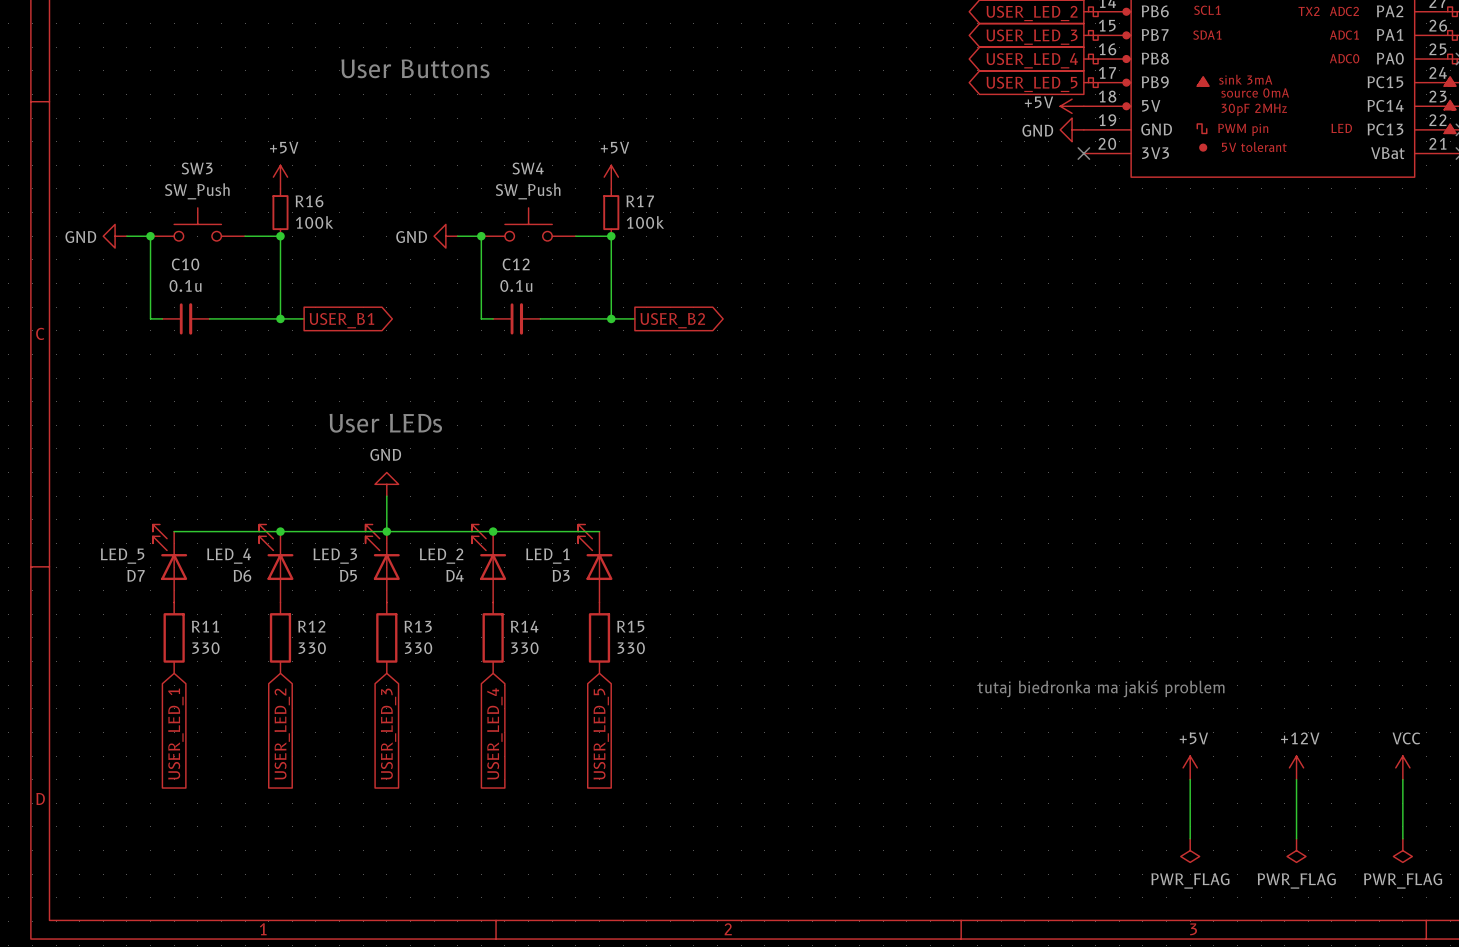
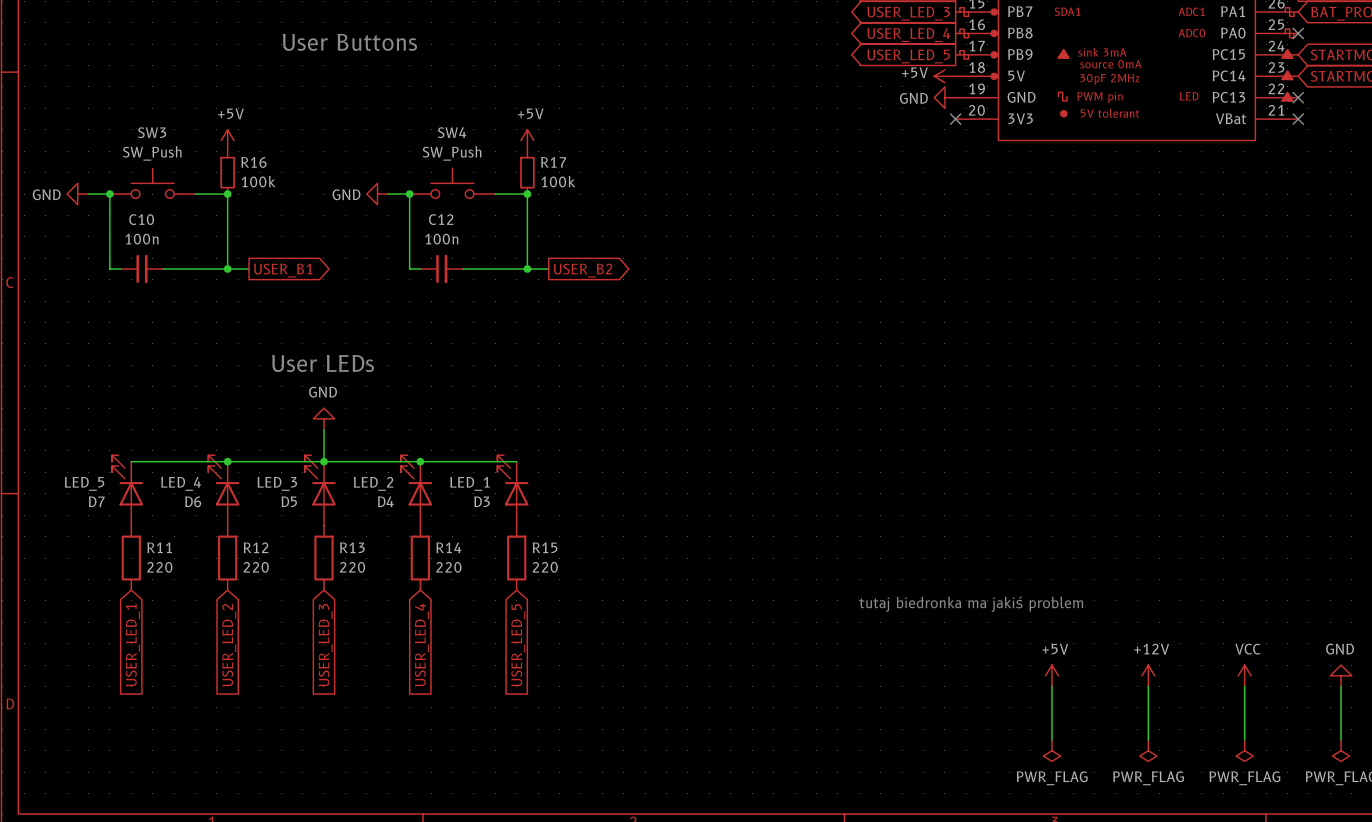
C10 value: 0.1u (185, 285) -> 100n (141, 239)
C12 value: 0.1u (516, 285) -> 100n (441, 239)
R11 value: 330 (205, 648) -> 220 (159, 567)
R12 value: 330 (312, 648) -> 220 (256, 567)
R13 value: 330 (418, 648) -> 220 (352, 567)
R14 value: 330 (524, 648) -> 220 (448, 567)
R15 value: 330 (631, 648) -> 220 (545, 567)

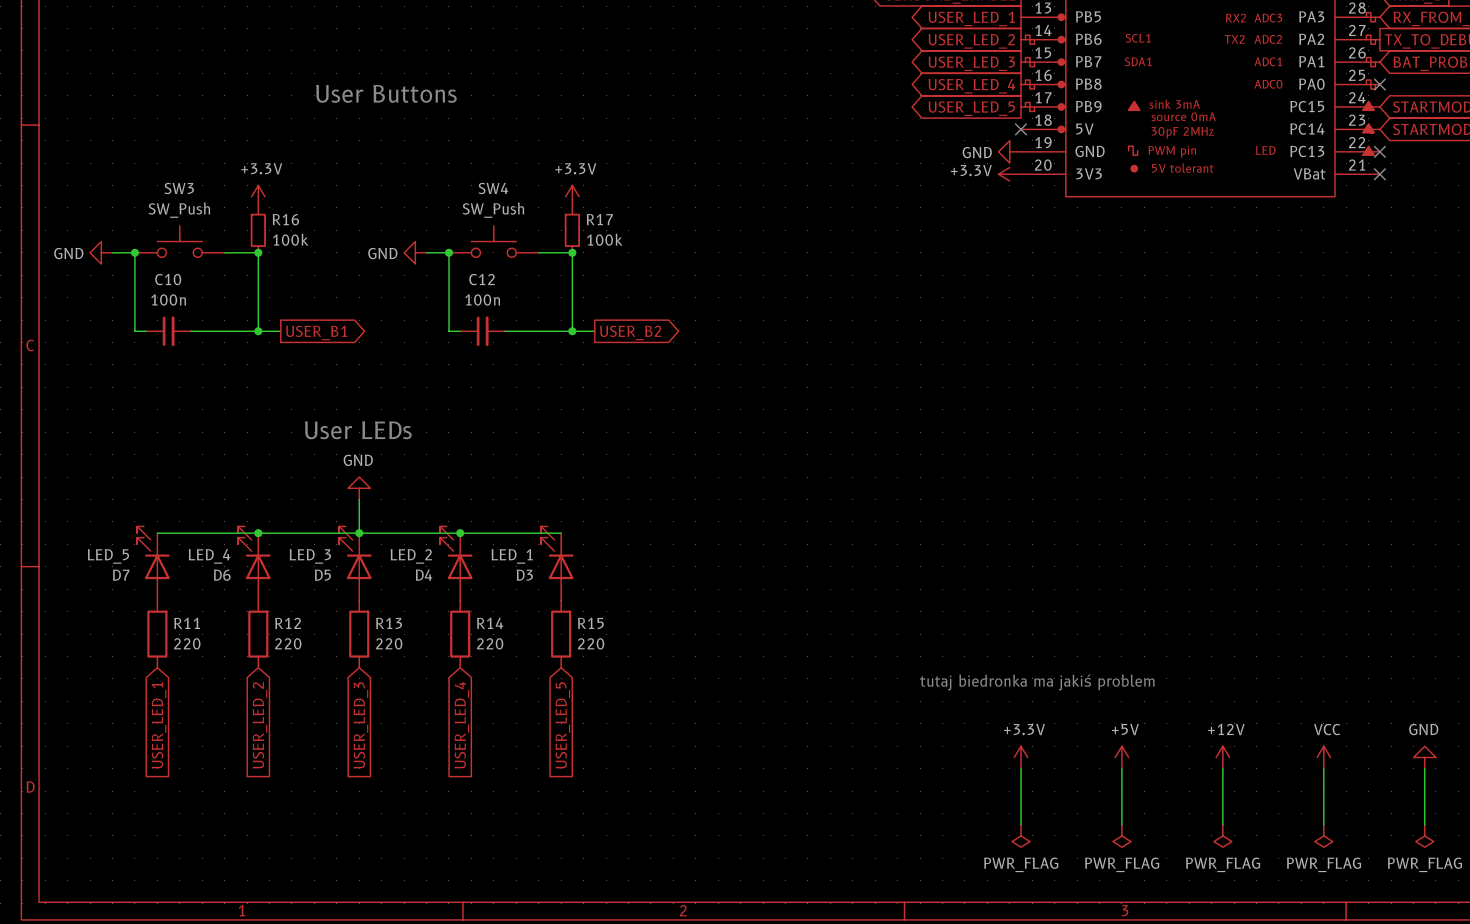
power symbol: +5V (944, 76) -> none
power symbol: none -> +3.3V (1009, 174)
no-connect mark position: (955, 119) -> (1020, 129)
power symbol: +5V (227, 140) -> +3.3V (258, 196)
power symbol: +5V (527, 140) -> +3.3V (572, 196)
power symbol: none -> +3.3V (1020, 757)
wire: none -> (1020, 768) (1020, 824)
power symbol: none -> PWR_FLAG (1020, 835)

